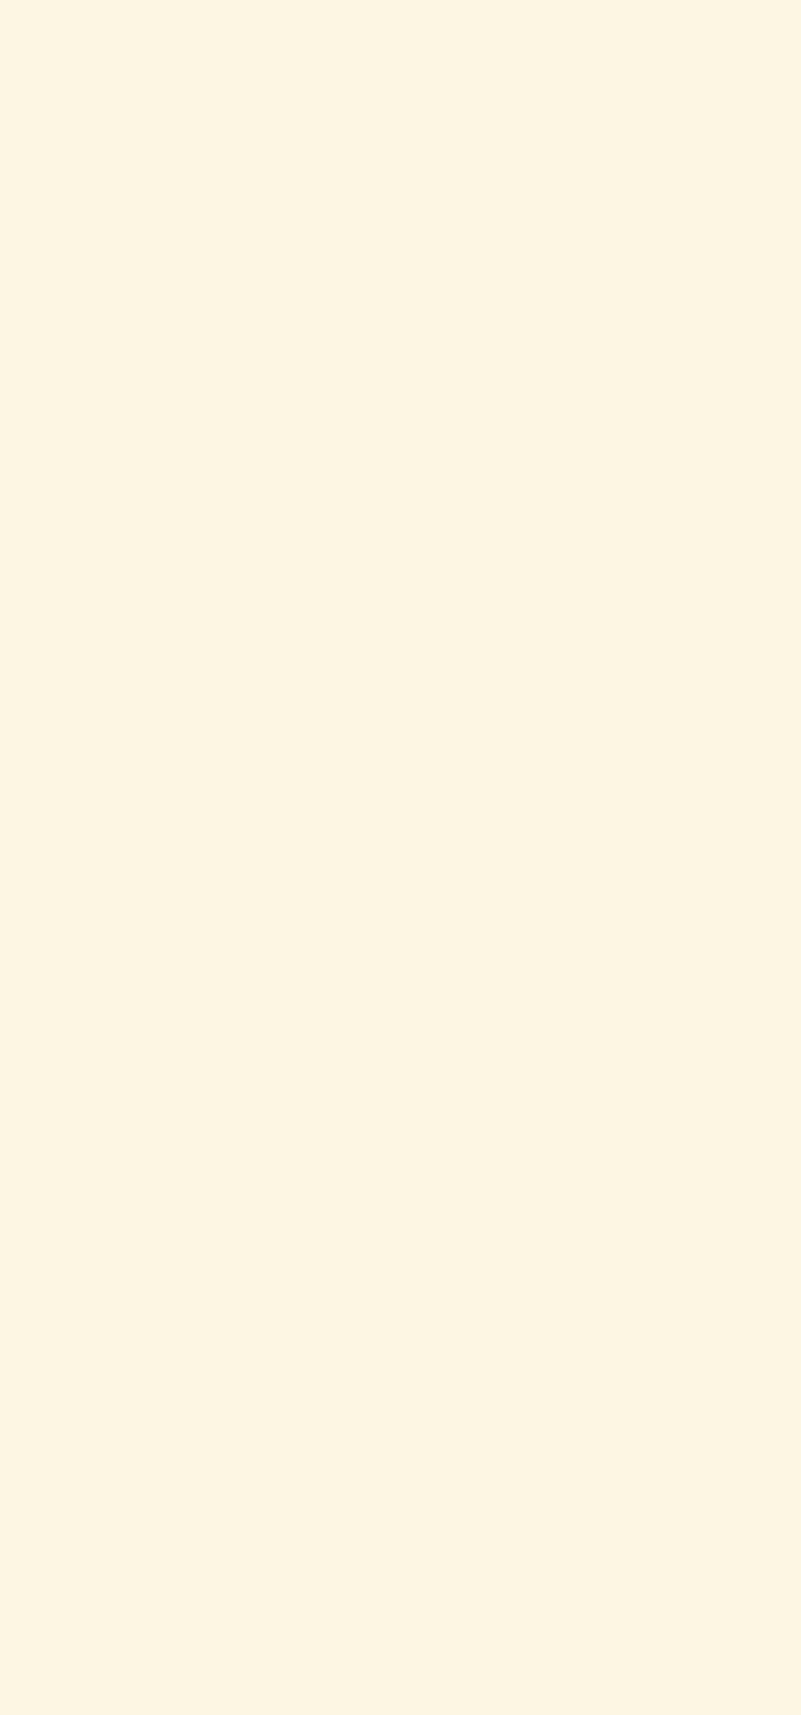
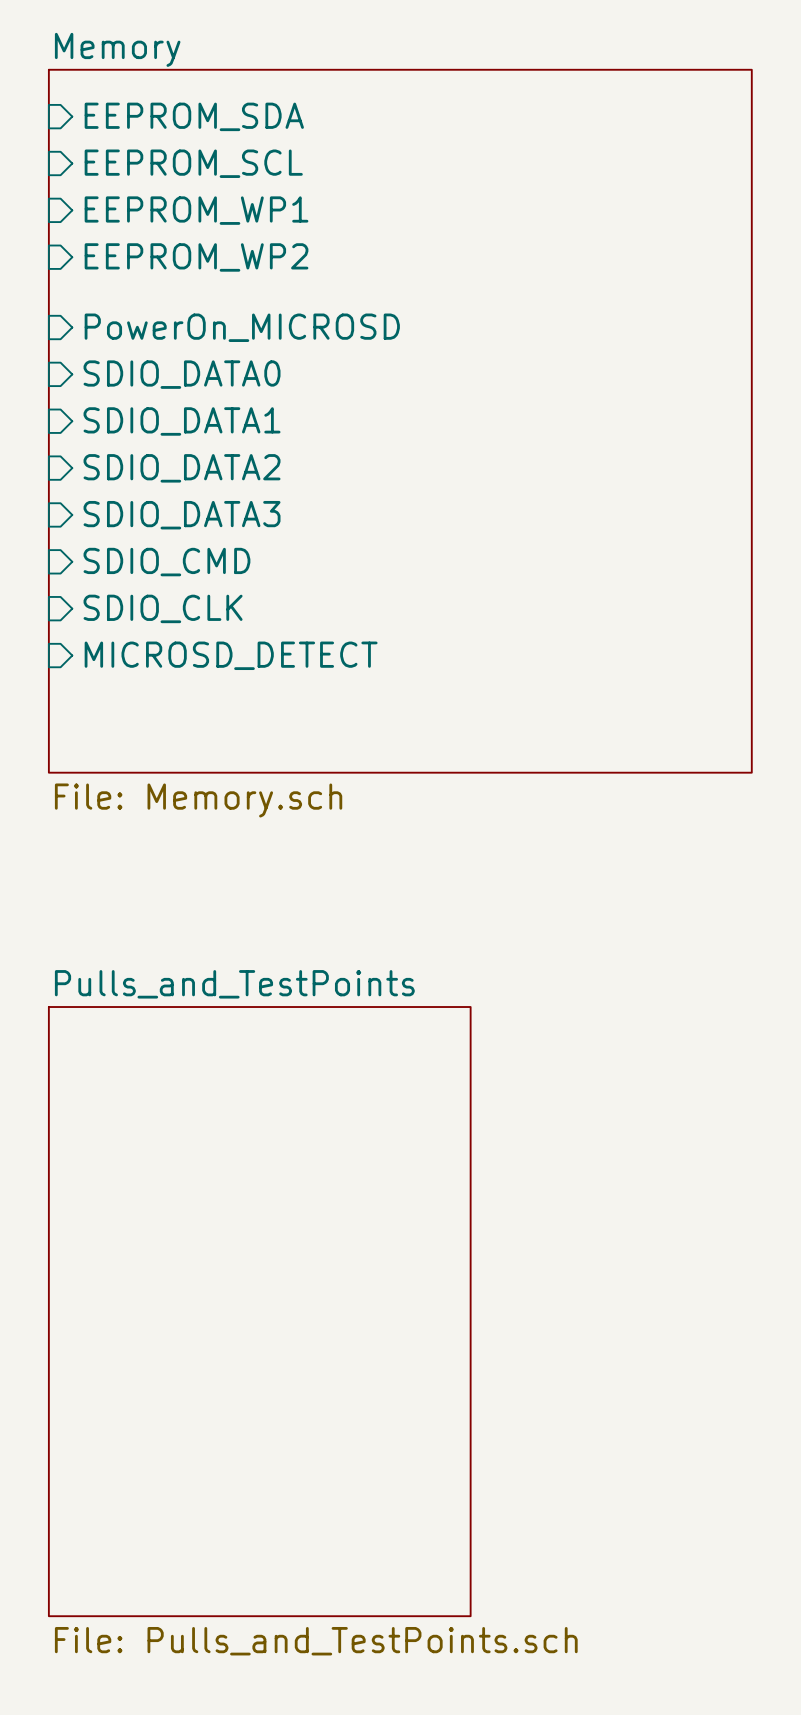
sheet pin: none -> EEPROM_SDA (194, 116)
sheet pin: none -> EEPROM_SCL (193, 163)
sheet pin: none -> EEPROM_WP1 (196, 210)
sheet pin: none -> EEPROM_WP2 (196, 257)
sheet pin: none -> PowerOn_MICROSD (242, 327)
sheet pin: none -> SDIO_DATA0 (182, 374)
sheet Memory: none -> File: Memory.sch (400, 421)
sheet pin: none -> SDIO_DATA1 (182, 421)
sheet pin: none -> SDIO_DATA2 (182, 468)
sheet pin: none -> SDIO_DATA3 (182, 515)
sheet pin: none -> SDIO_CMD (166, 562)
sheet pin: none -> SDIO_CLK (163, 608)
sheet pin: none -> MICROSD_DETECT (231, 655)
sheet Pulls_and_TestPoints: none -> File: Pulls_and_TestPoints.sch (259, 1311)

